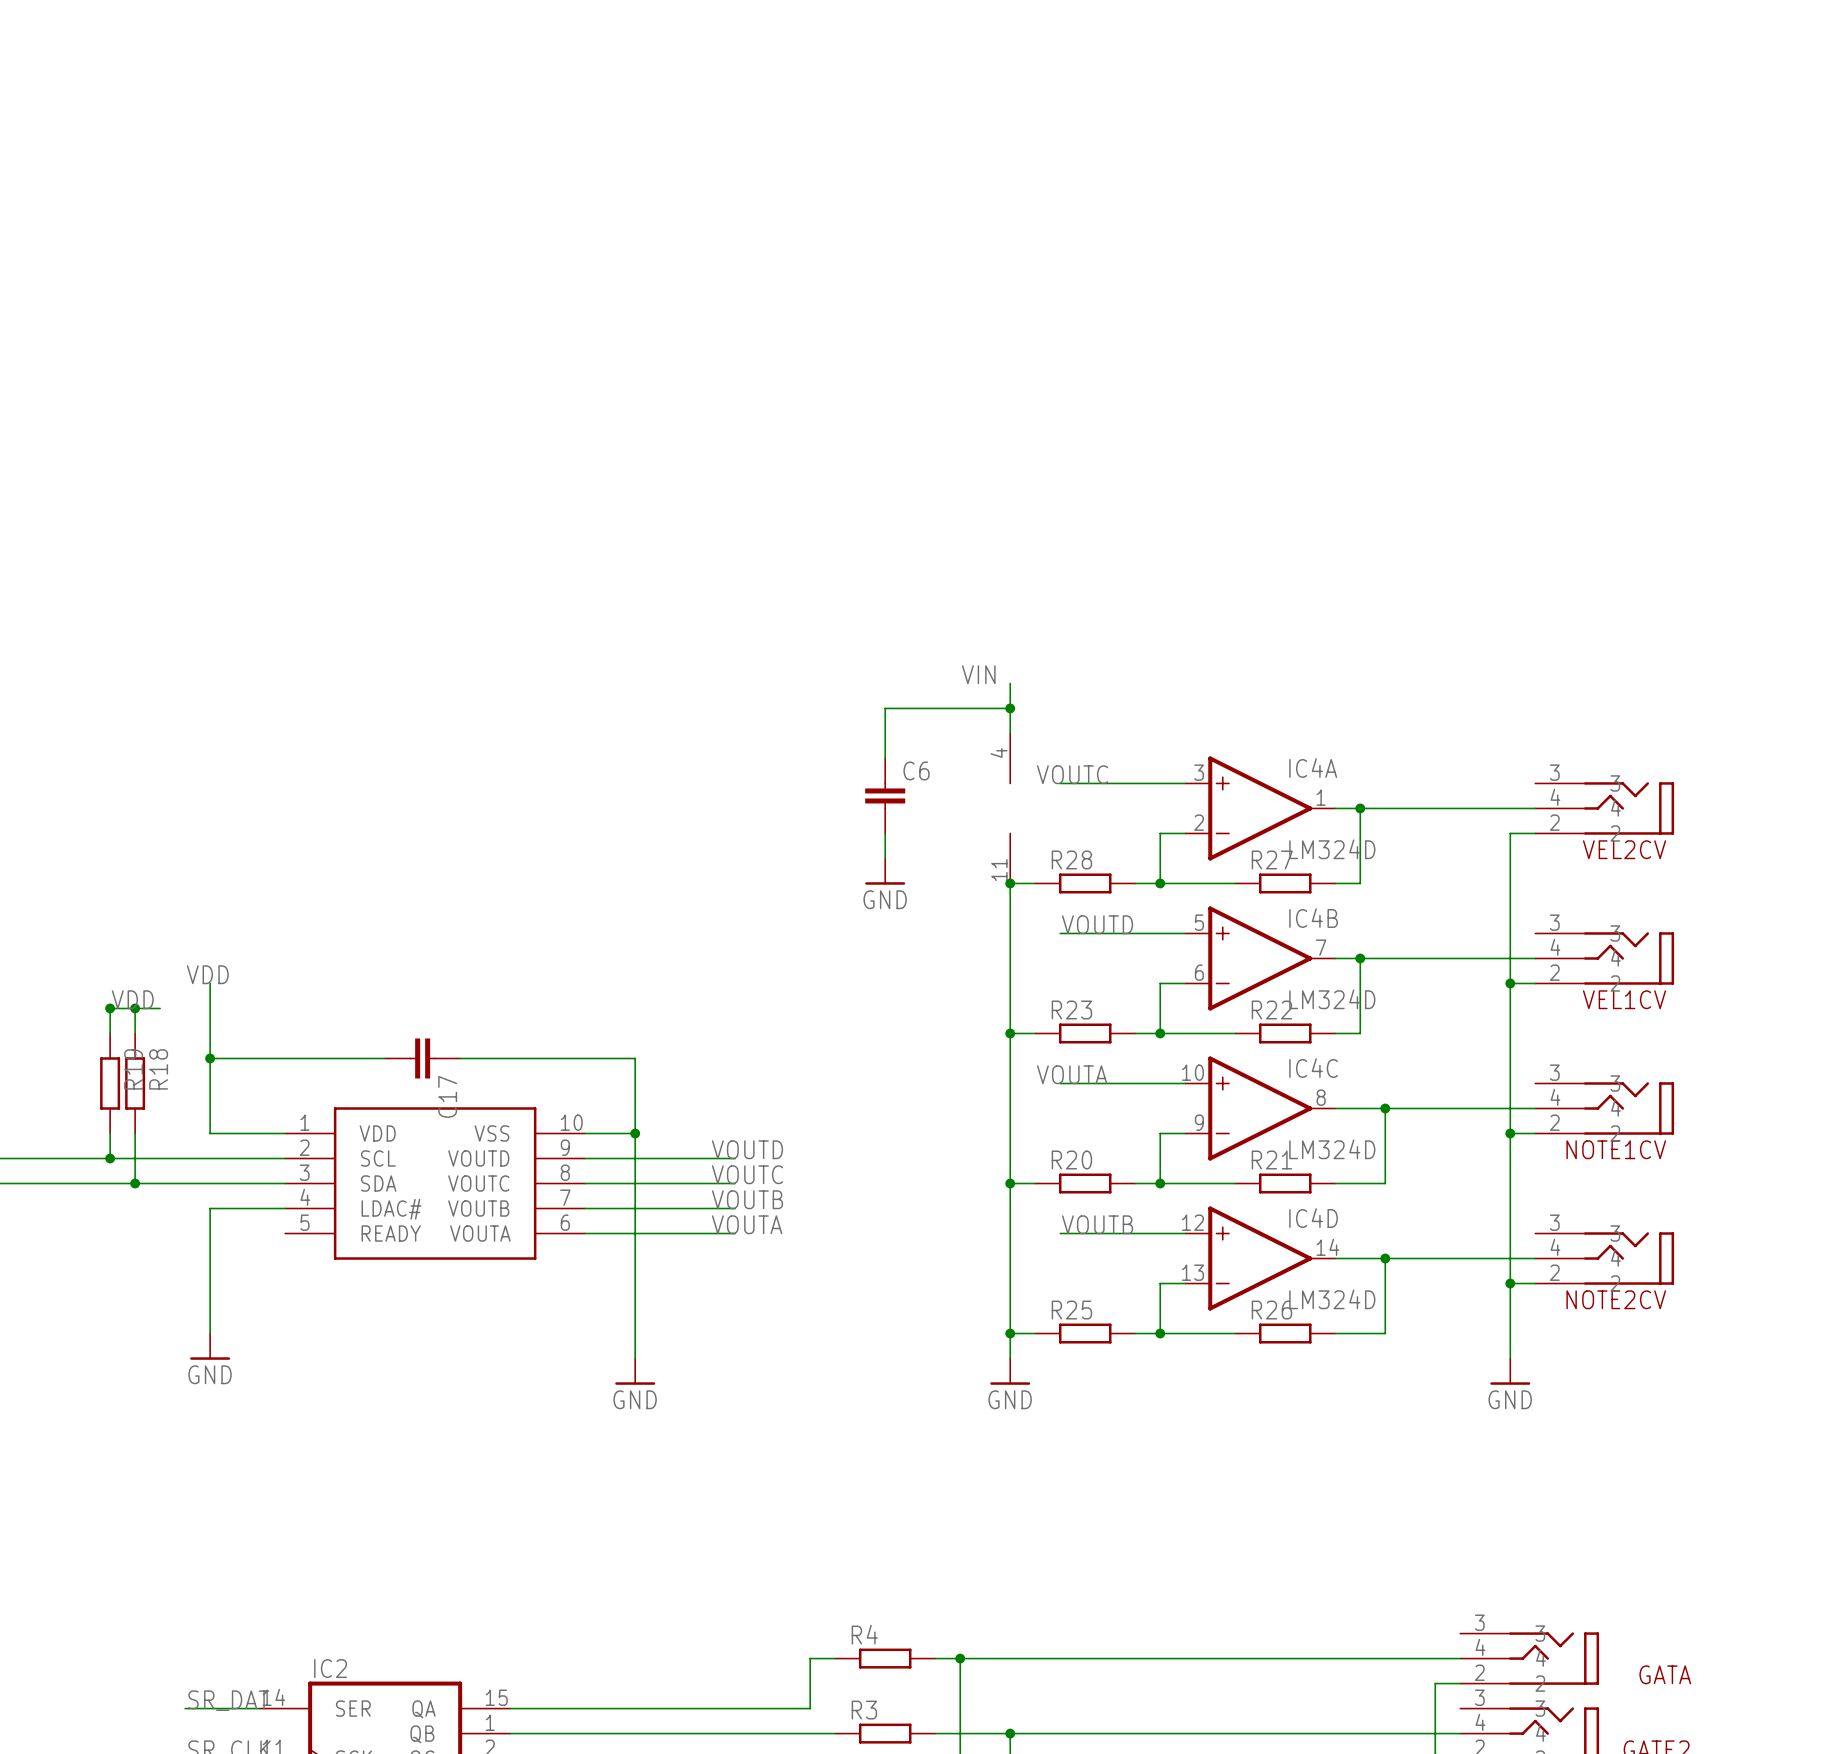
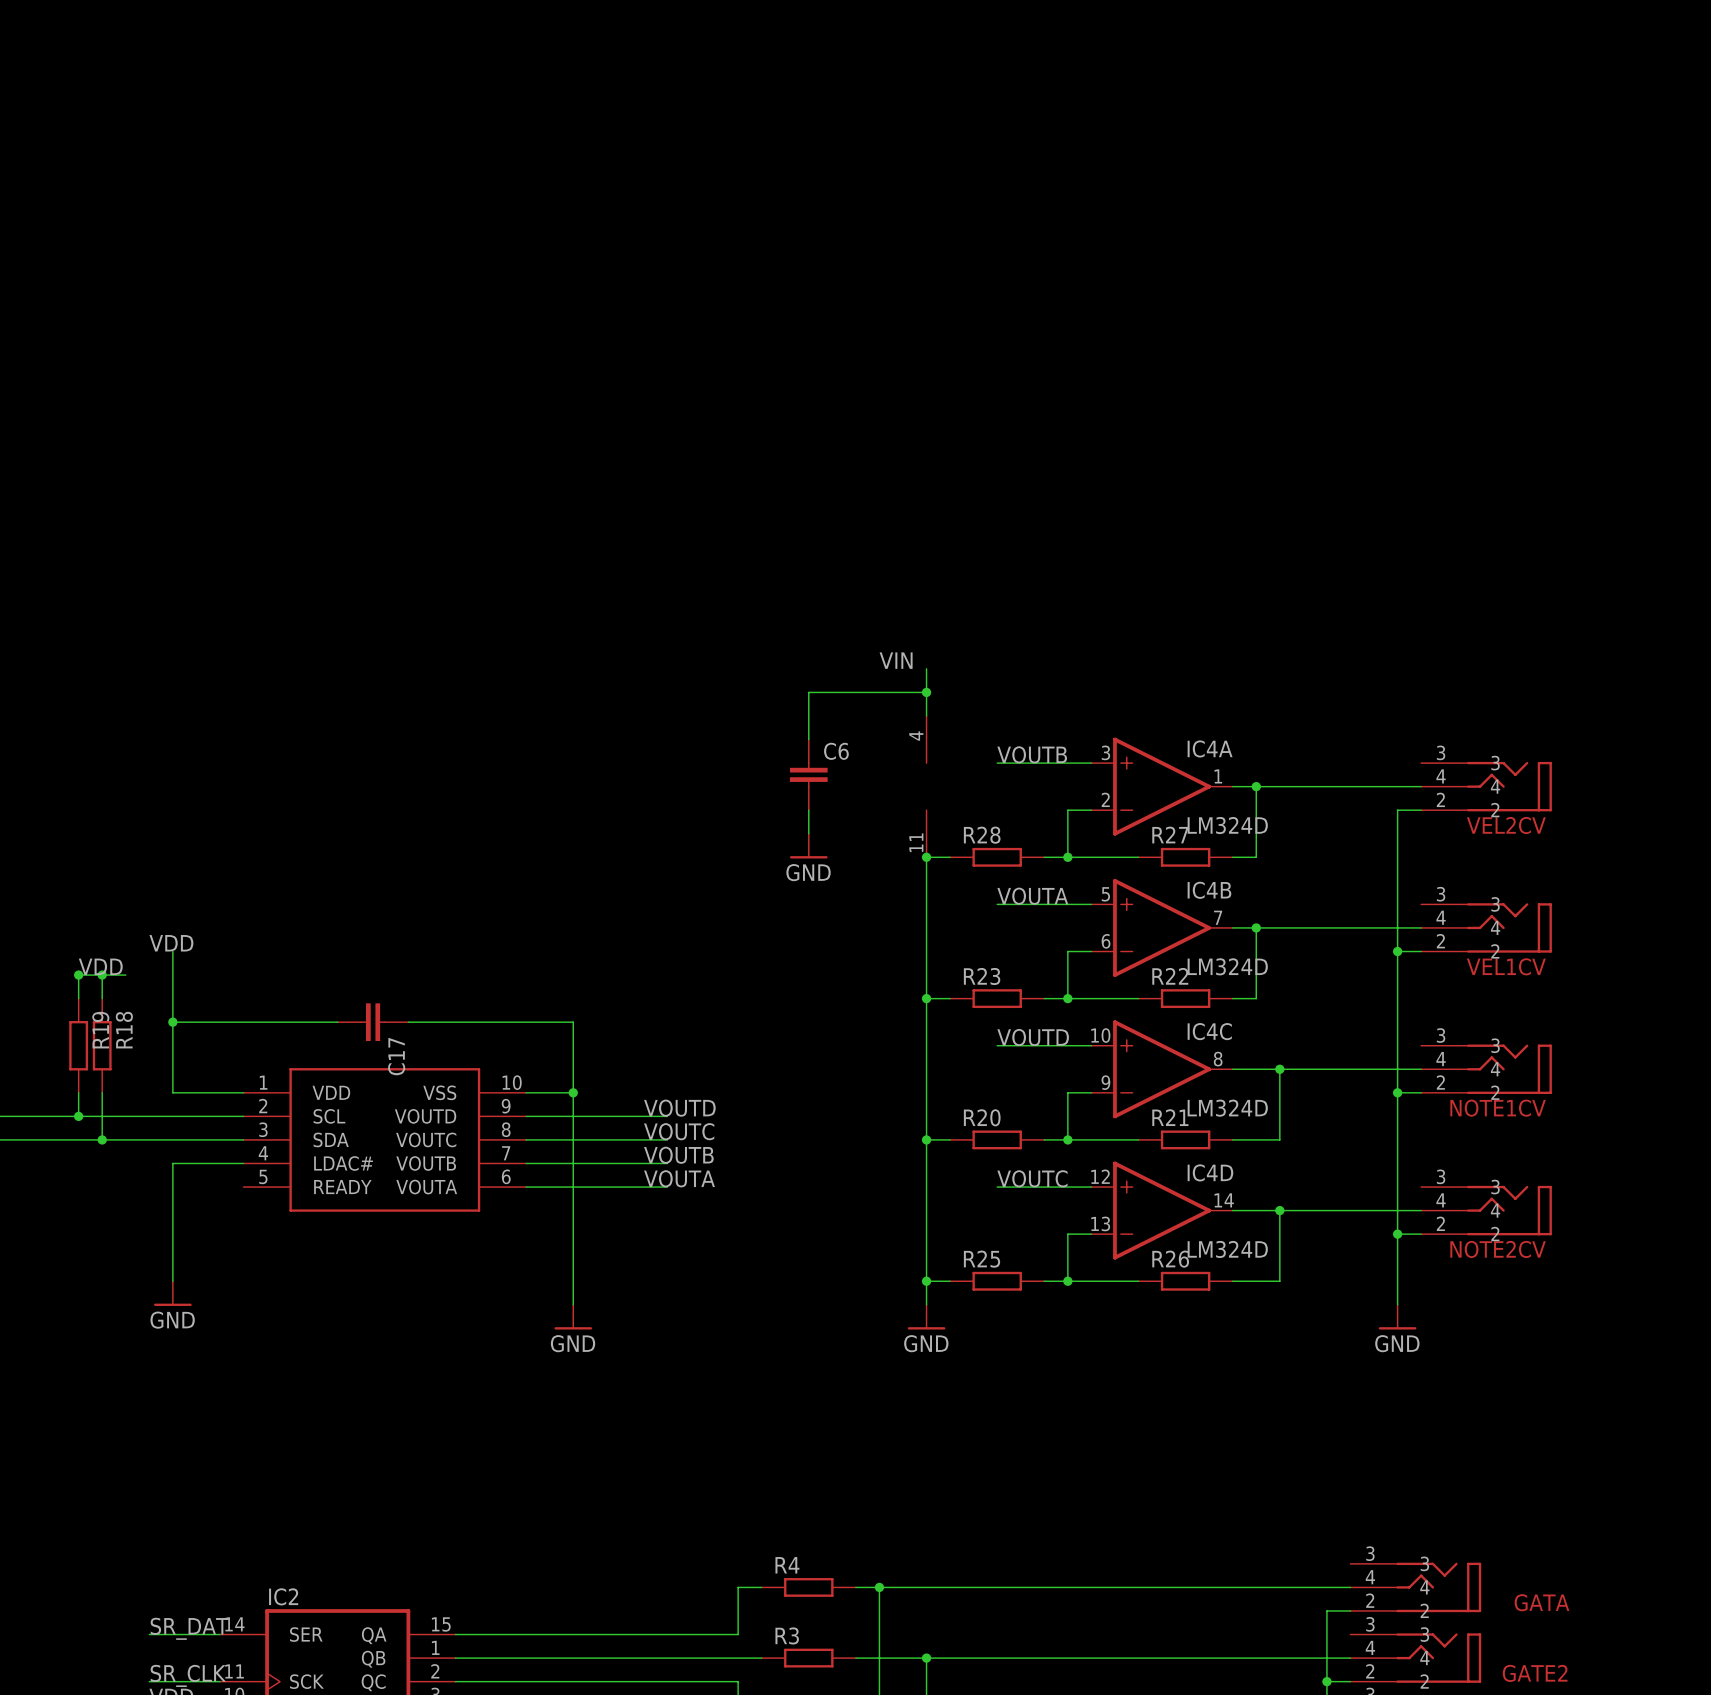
label: VOUTC (1072, 774) -> VOUTB (1032, 754)
wire: (1060, 783) (1085, 783) -> none
label position: VOUTD (1097, 924) -> VOUTD (1033, 1037)
wire: (1060, 933) (1085, 933) -> none
label position: VOUTA (1072, 1074) -> VOUTA (1032, 896)
wire: (1060, 1083) (1085, 1083) -> none
label: VOUTB (1097, 1224) -> VOUTC (1032, 1178)
wire: (1060, 1233) (1085, 1233) -> none

